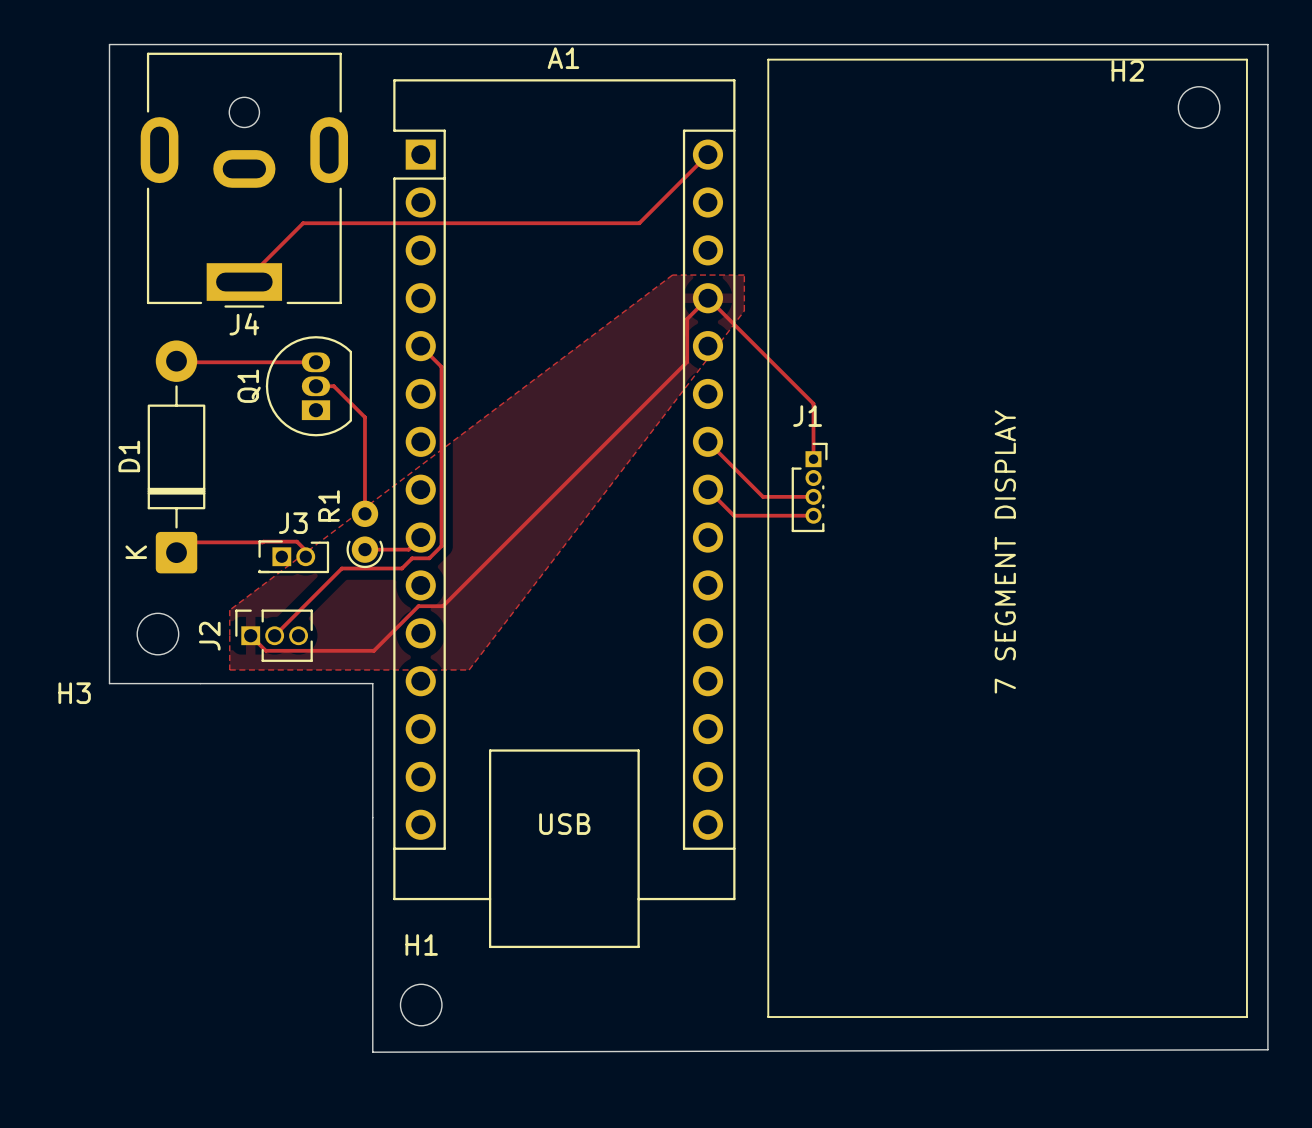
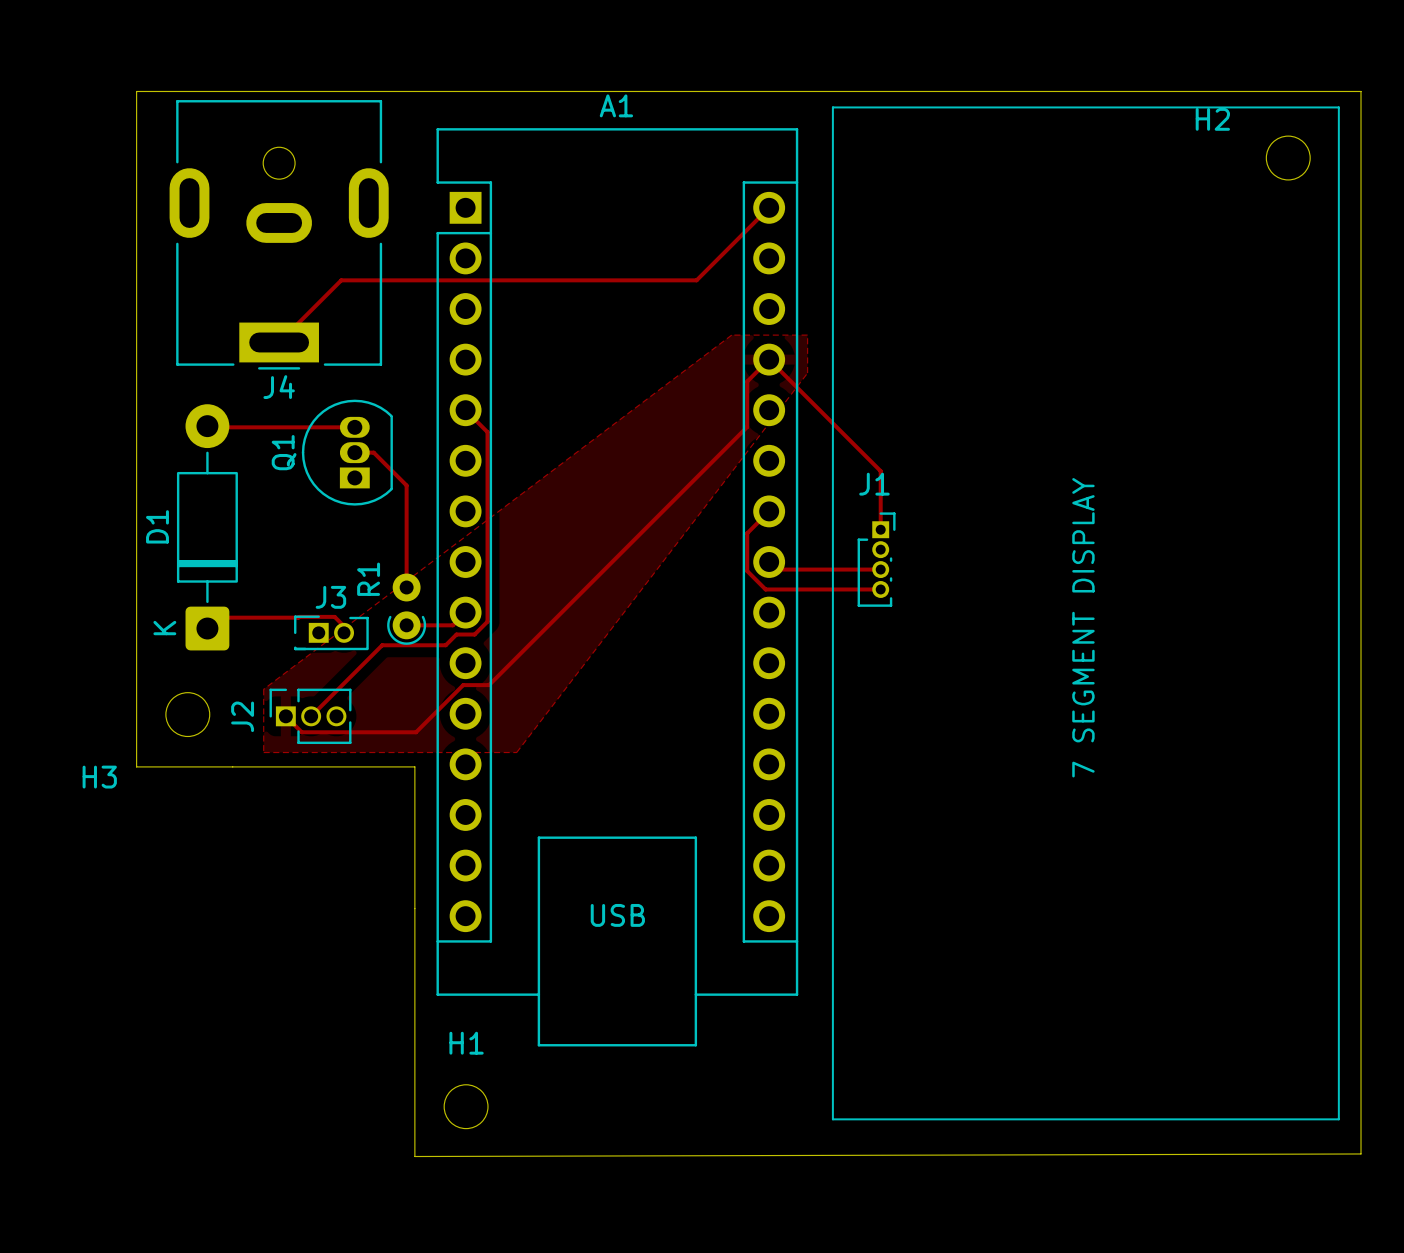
track: (707, 441) (763, 496) -> (769, 511) (747, 533) (747, 571) (765, 589) (796, 589)
track: (715, 496) (733, 515) -> (776, 569) (827, 569)

